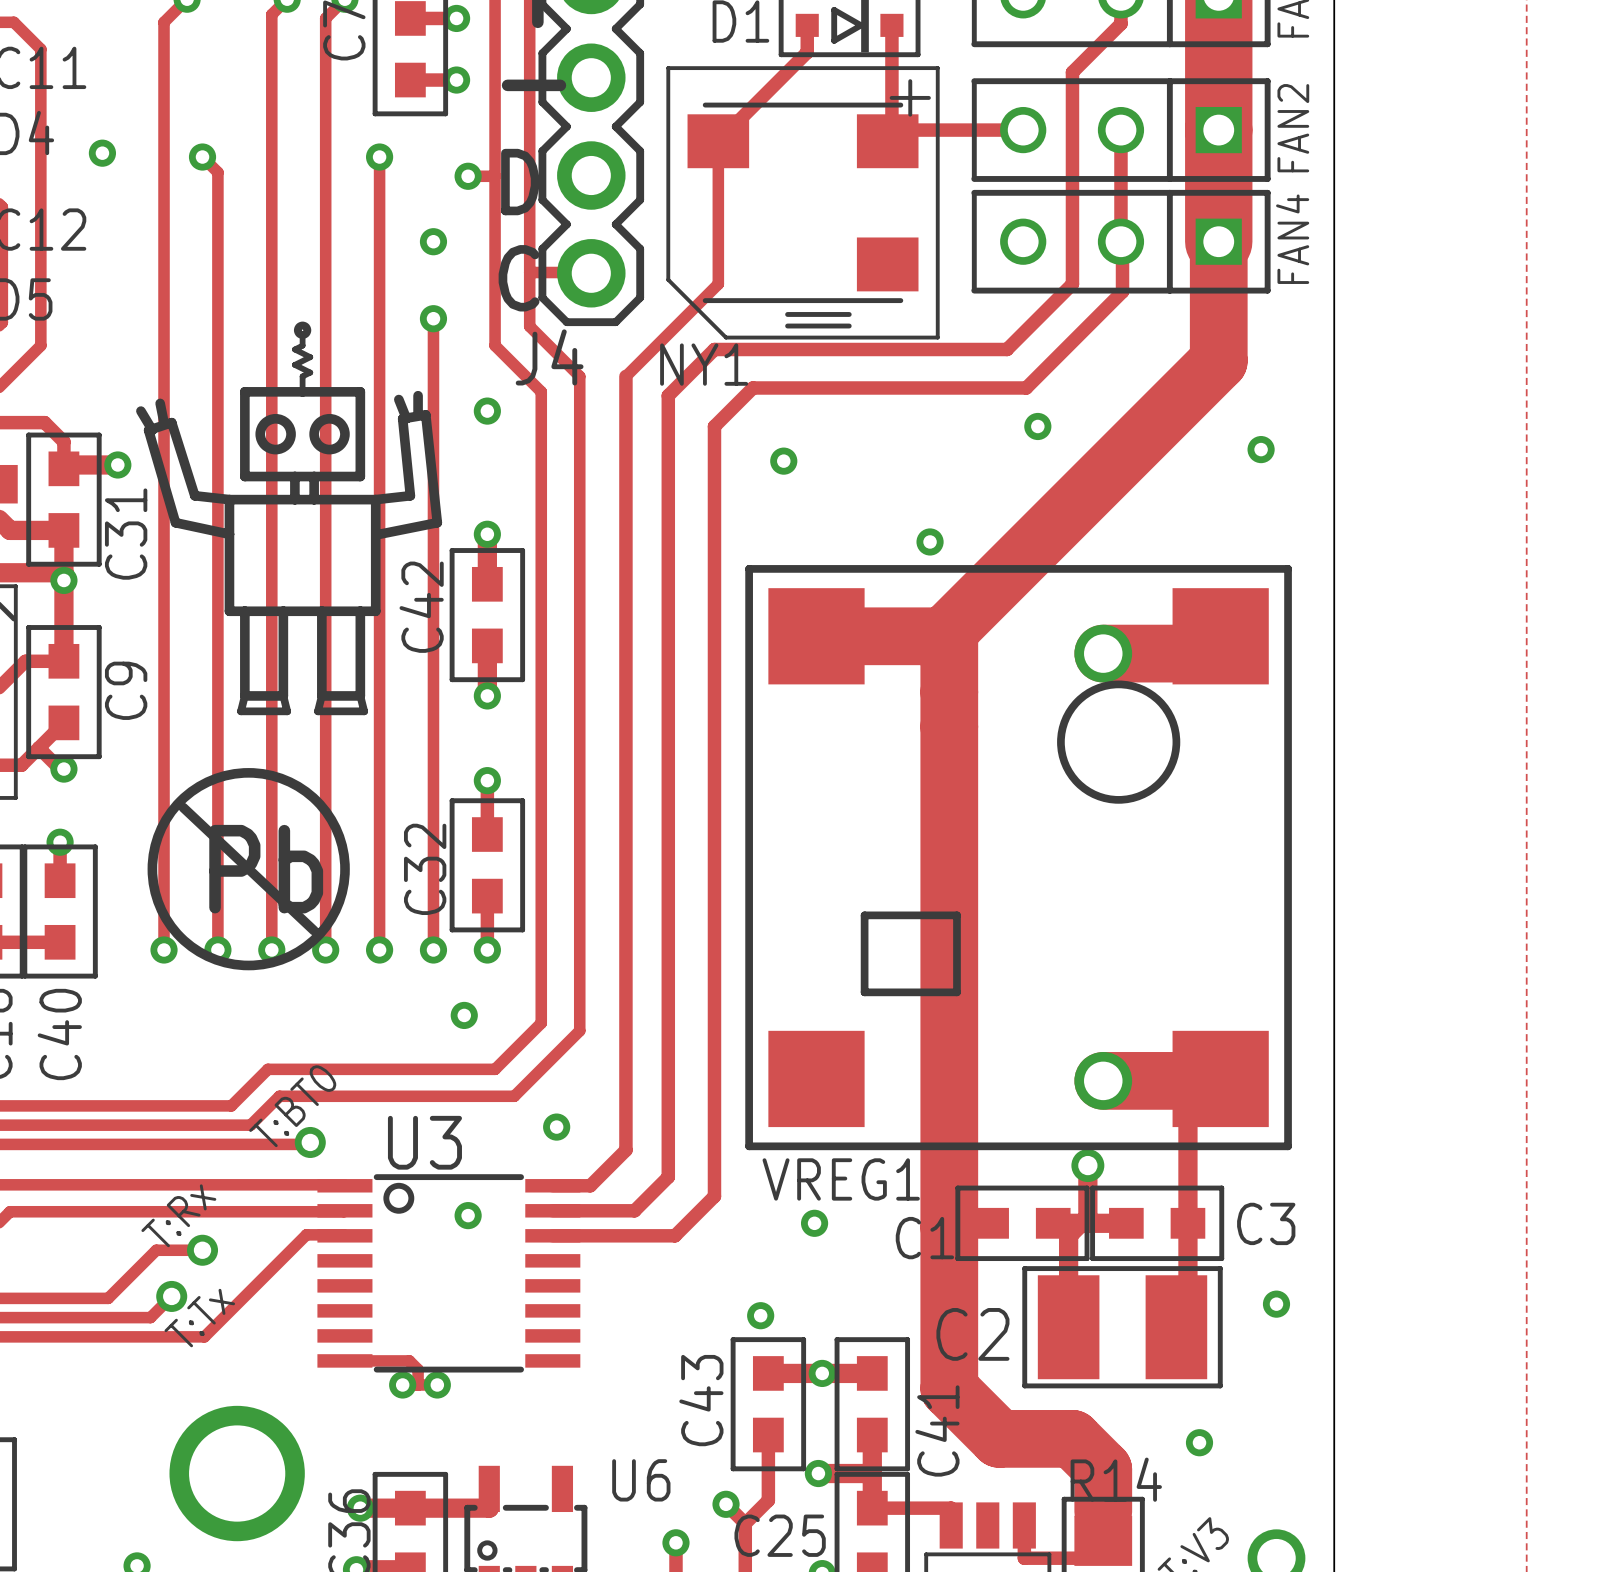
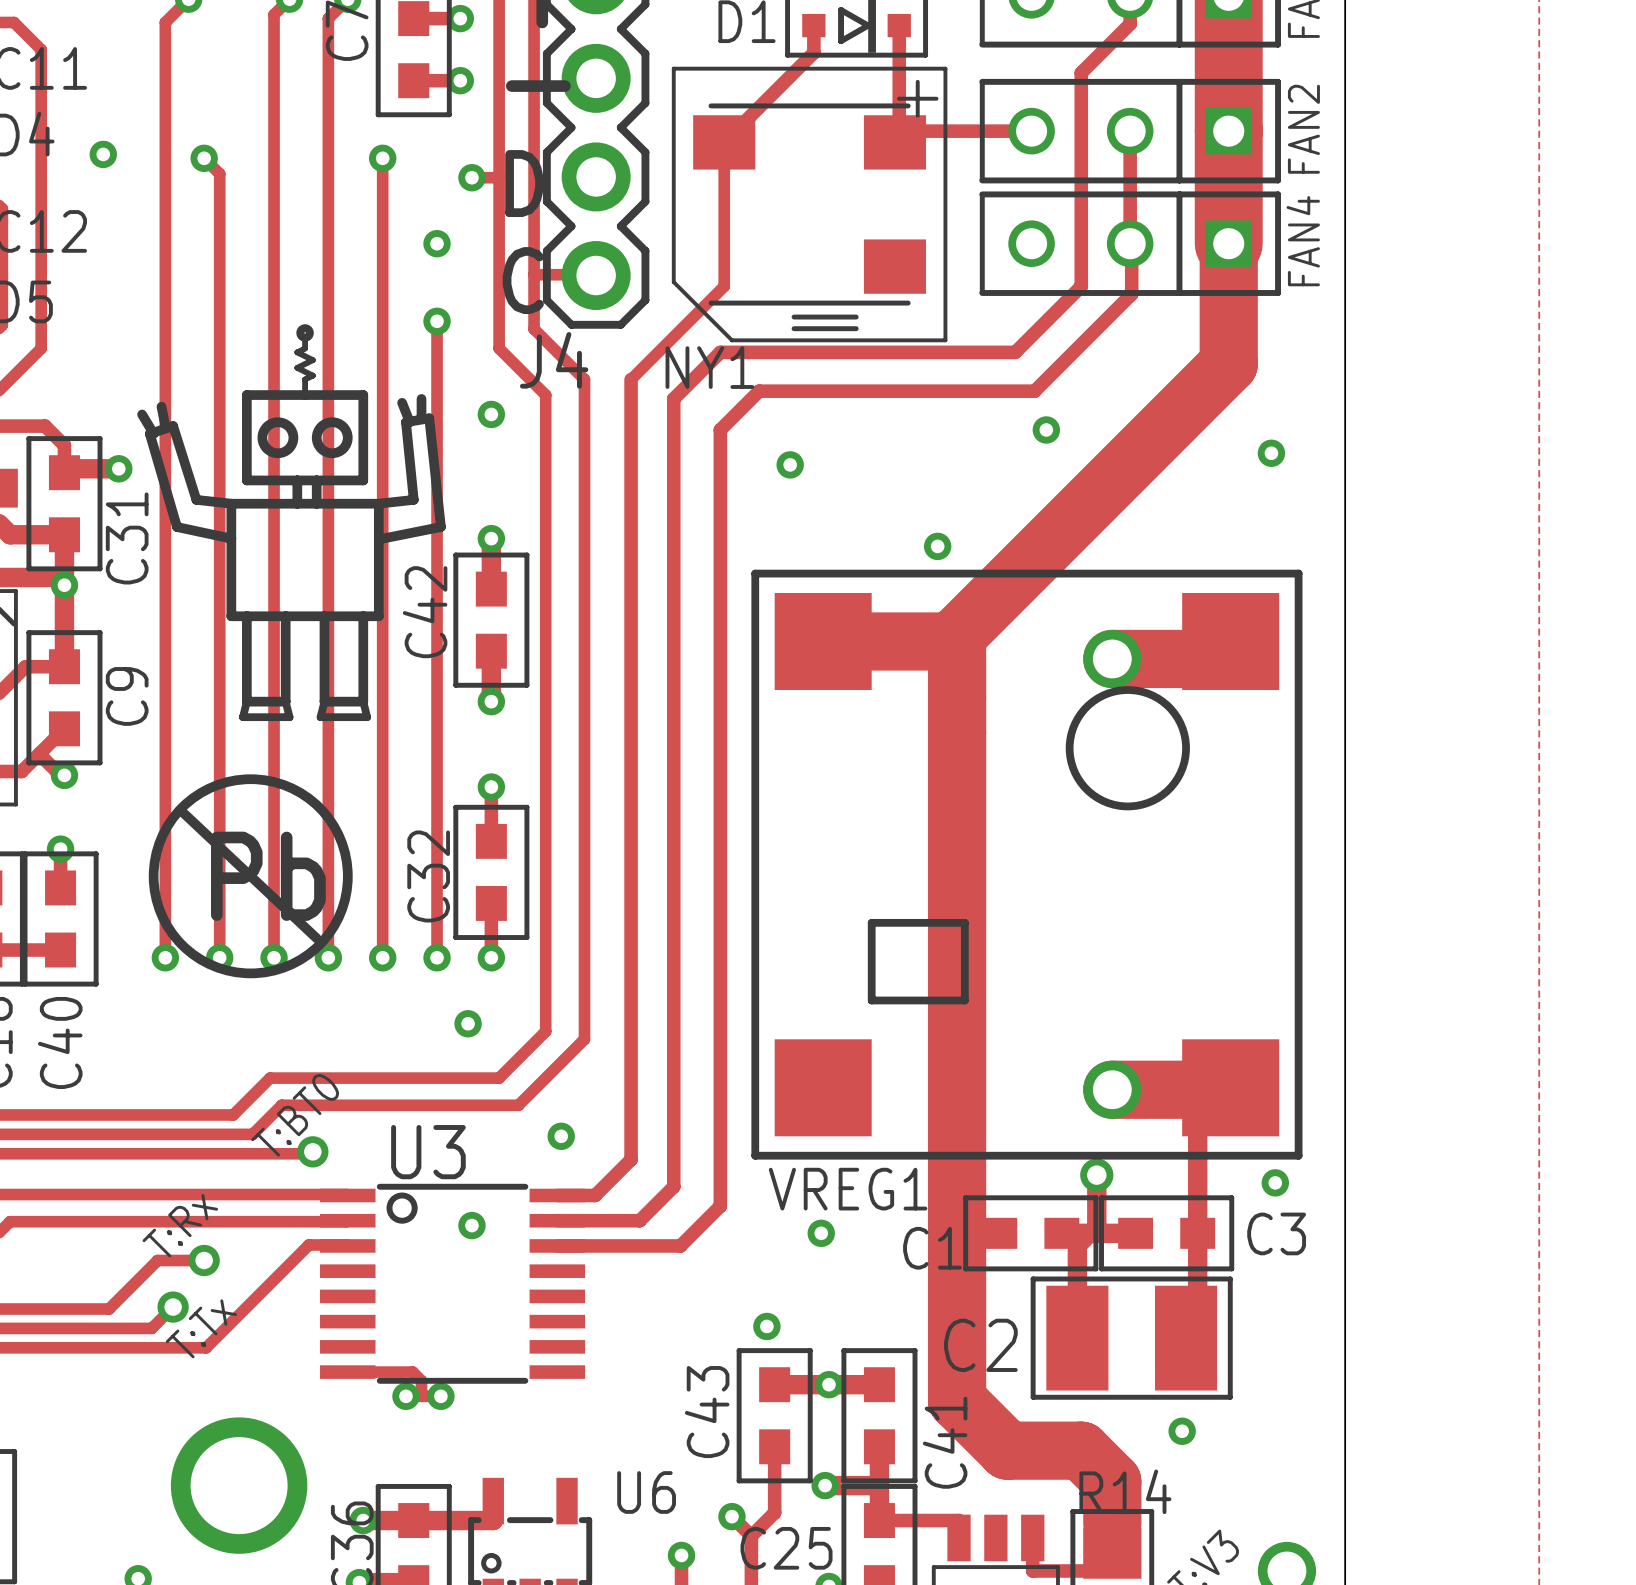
via: none -> (1275, 1182)
via: (1276, 1304) -> none
via position: (1199, 1442) -> (1182, 1431)

